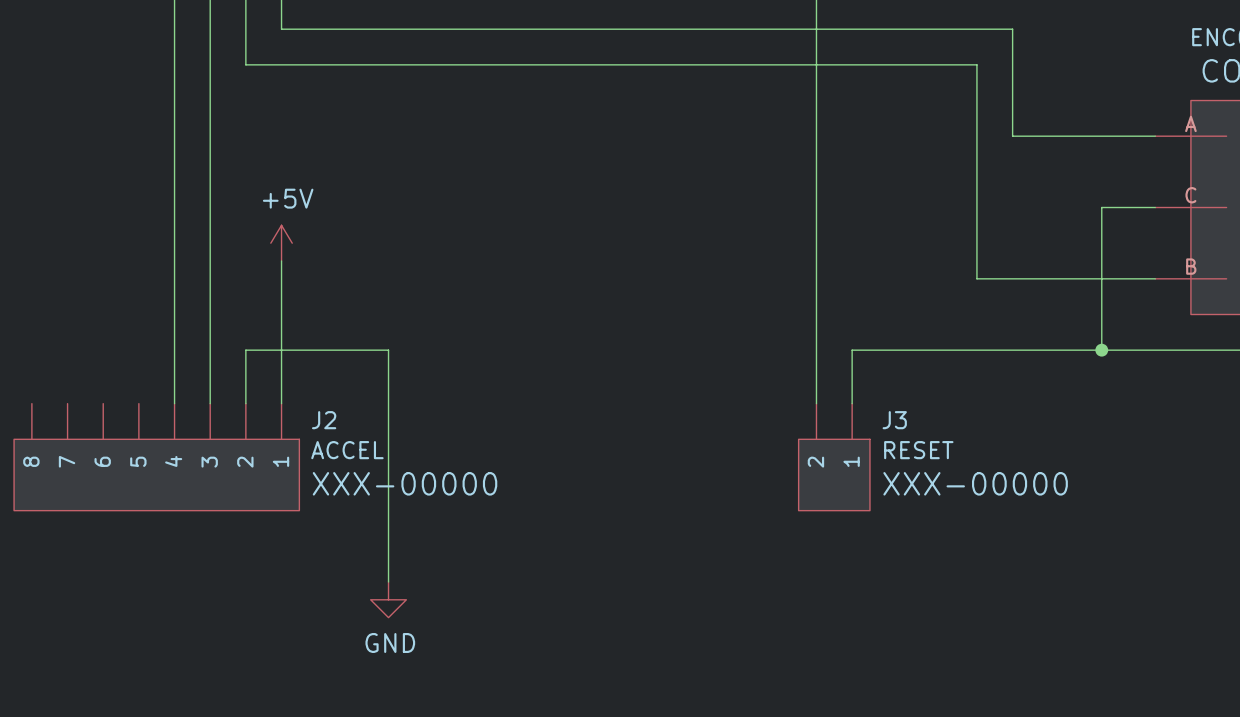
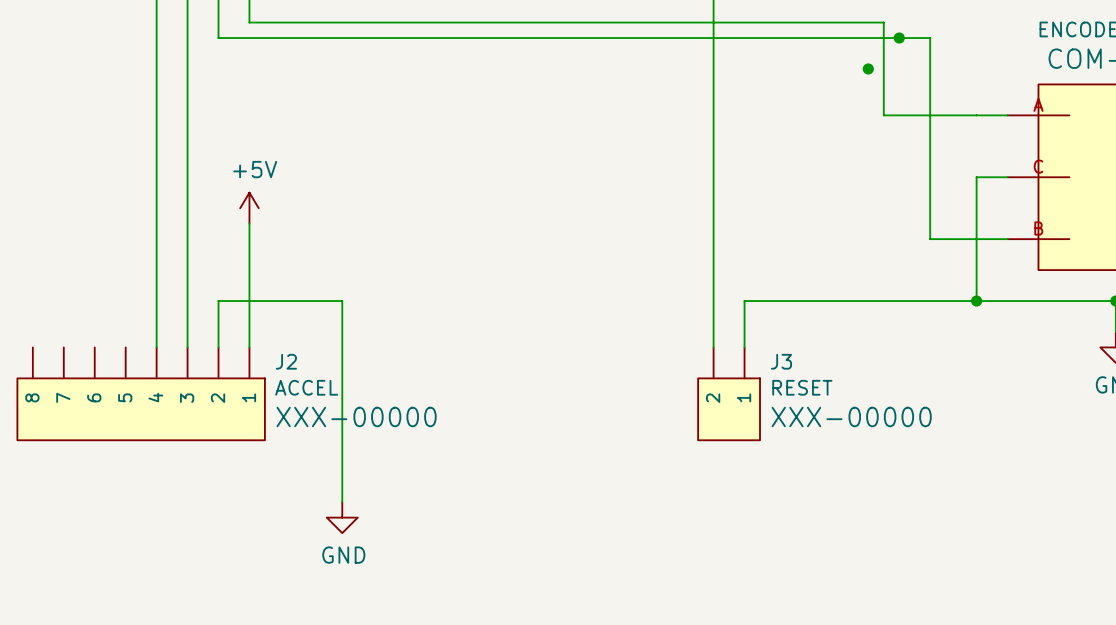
wire: (245, 47) (245, 64) (976, 64) (976, 278) (1066, 278) -> (218, 38) (930, 38) (930, 239)
junction: none -> (899, 38)
junction: none -> (868, 68)
wire: (1119, 207) (1101, 207) (1101, 350) -> (976, 177) (976, 301)
junction position: (1101, 350) -> (976, 301)

